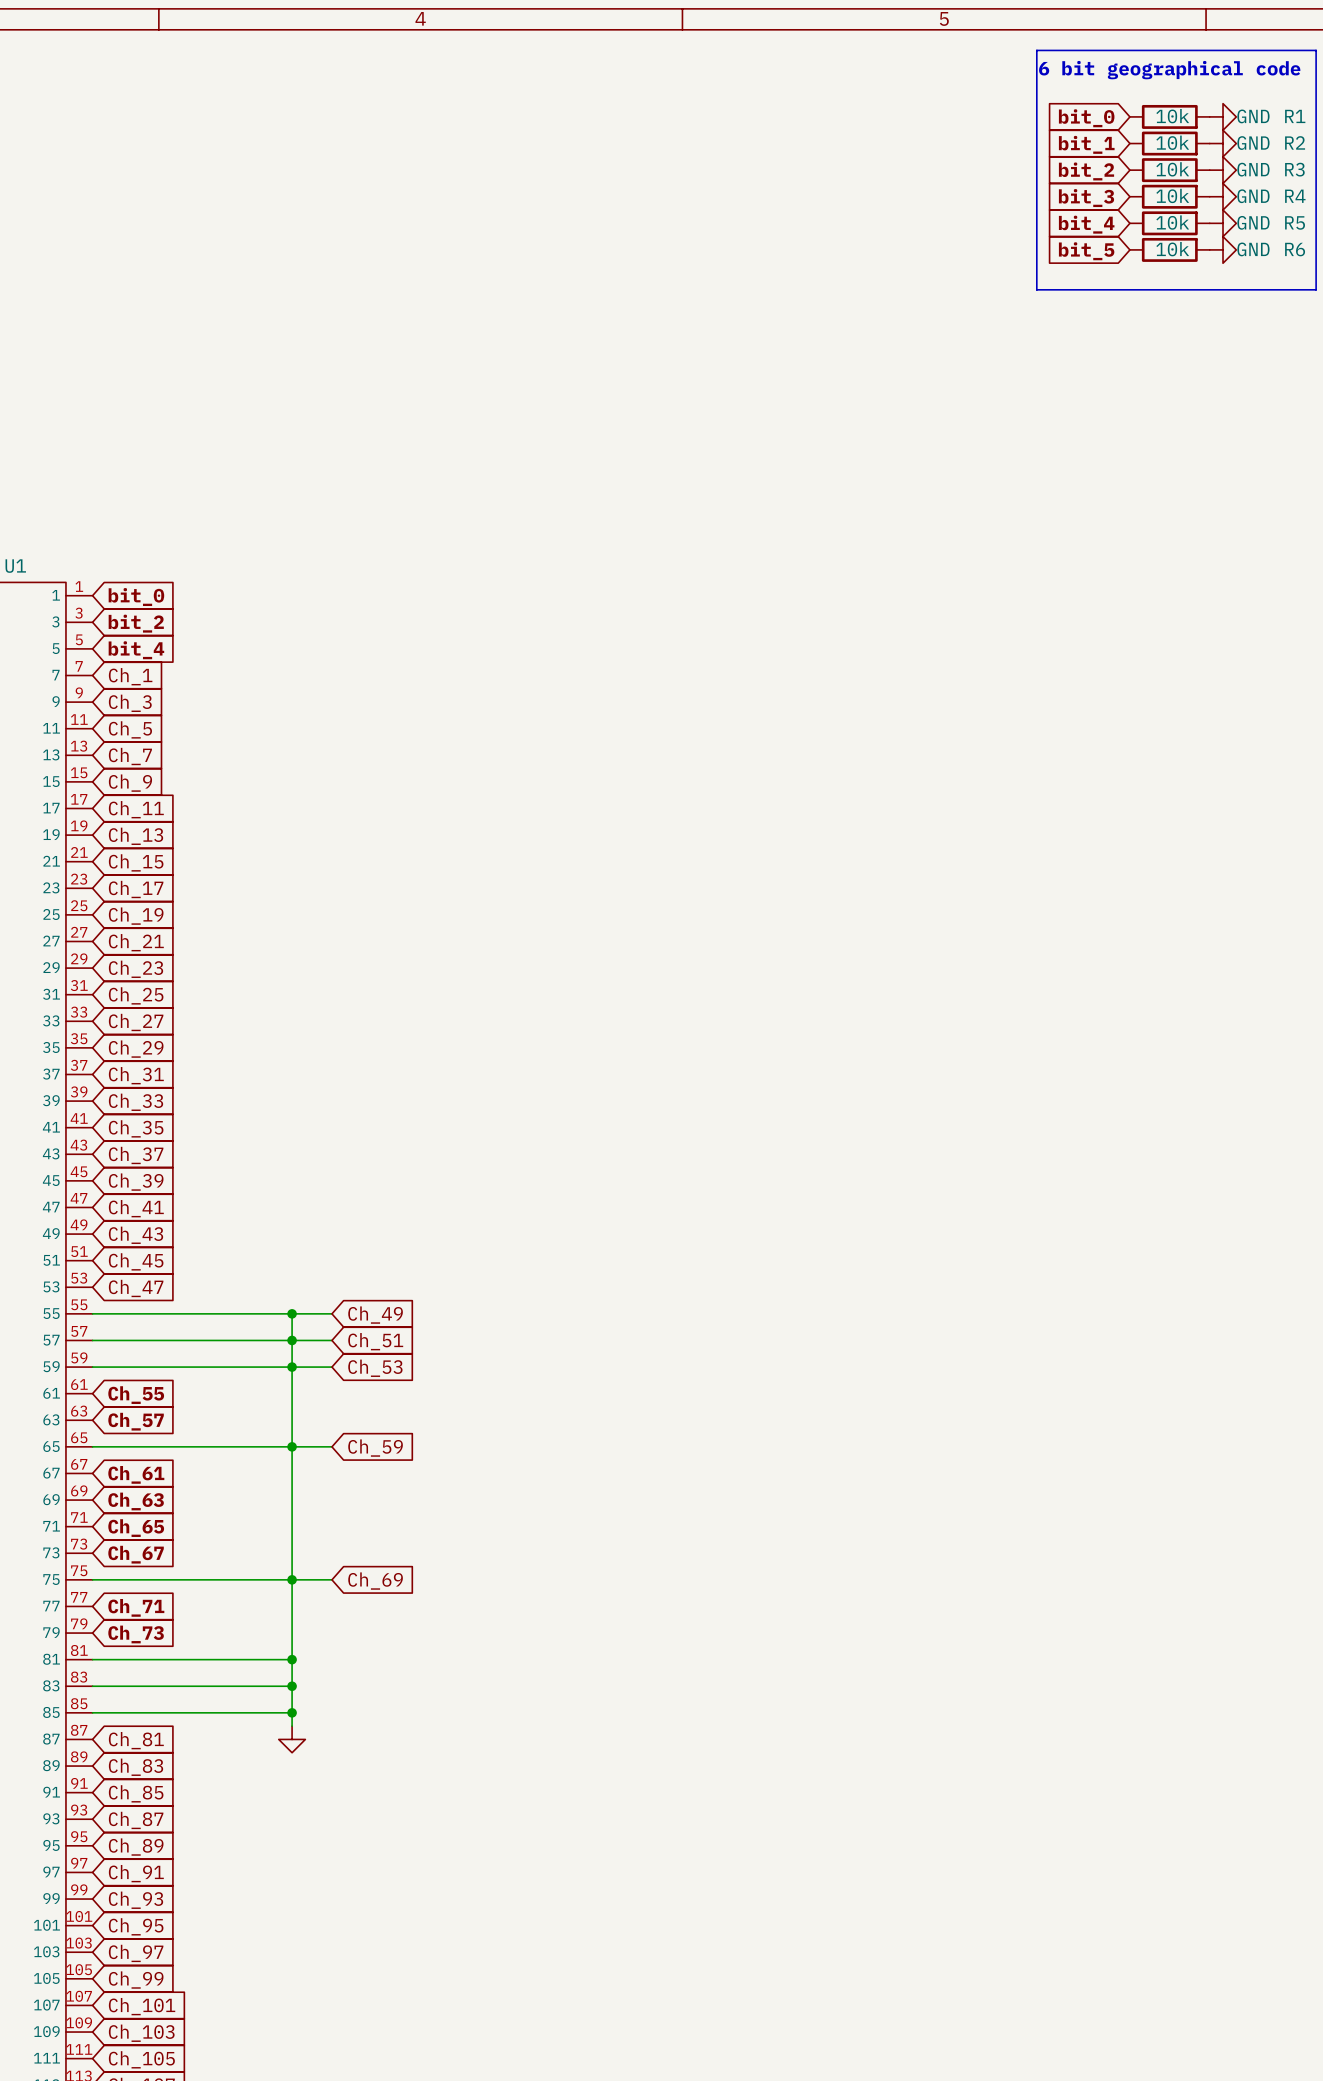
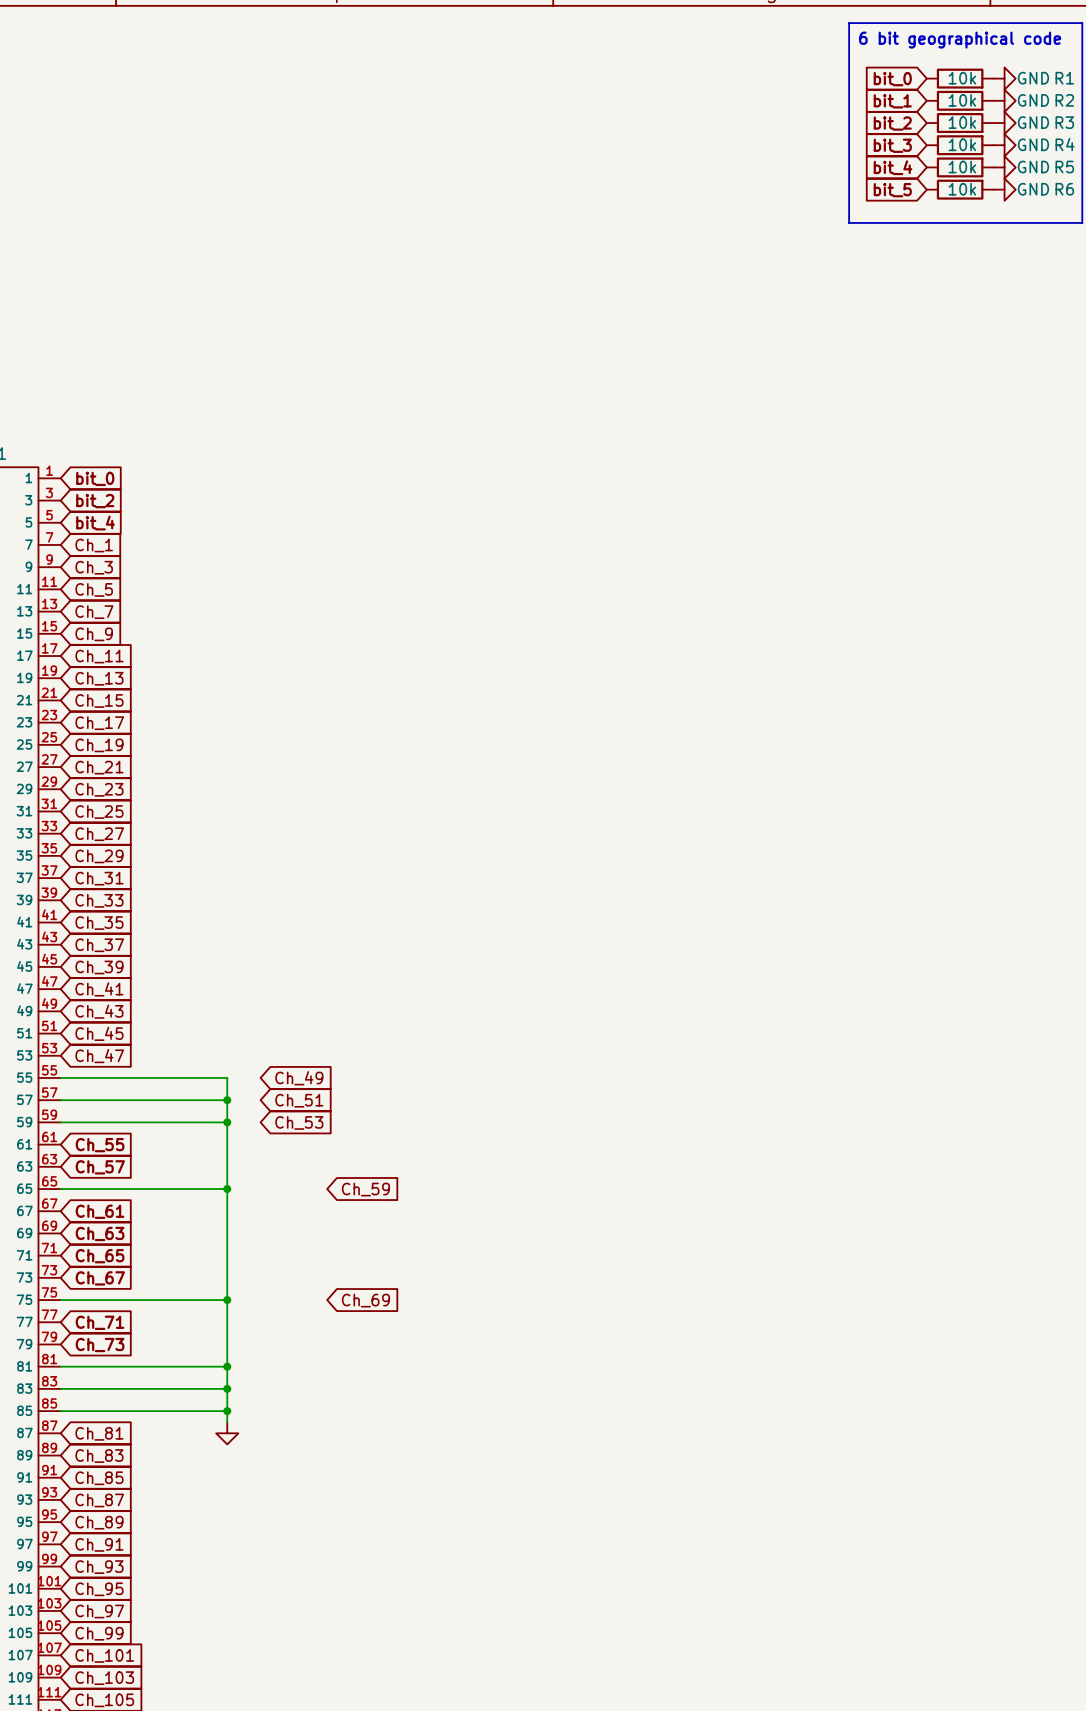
wire: (292, 1313) (331, 1313) -> none
junction: (292, 1313) -> none
wire: (292, 1340) (331, 1340) -> none
wire: (292, 1367) (331, 1367) -> none
wire: (292, 1446) (331, 1446) -> none
global label position: Ch_59 (375, 1448) -> Ch_59 (365, 1189)
wire: (292, 1579) (331, 1579) -> none
global label position: Ch_69 (375, 1581) -> Ch_69 (365, 1300)

